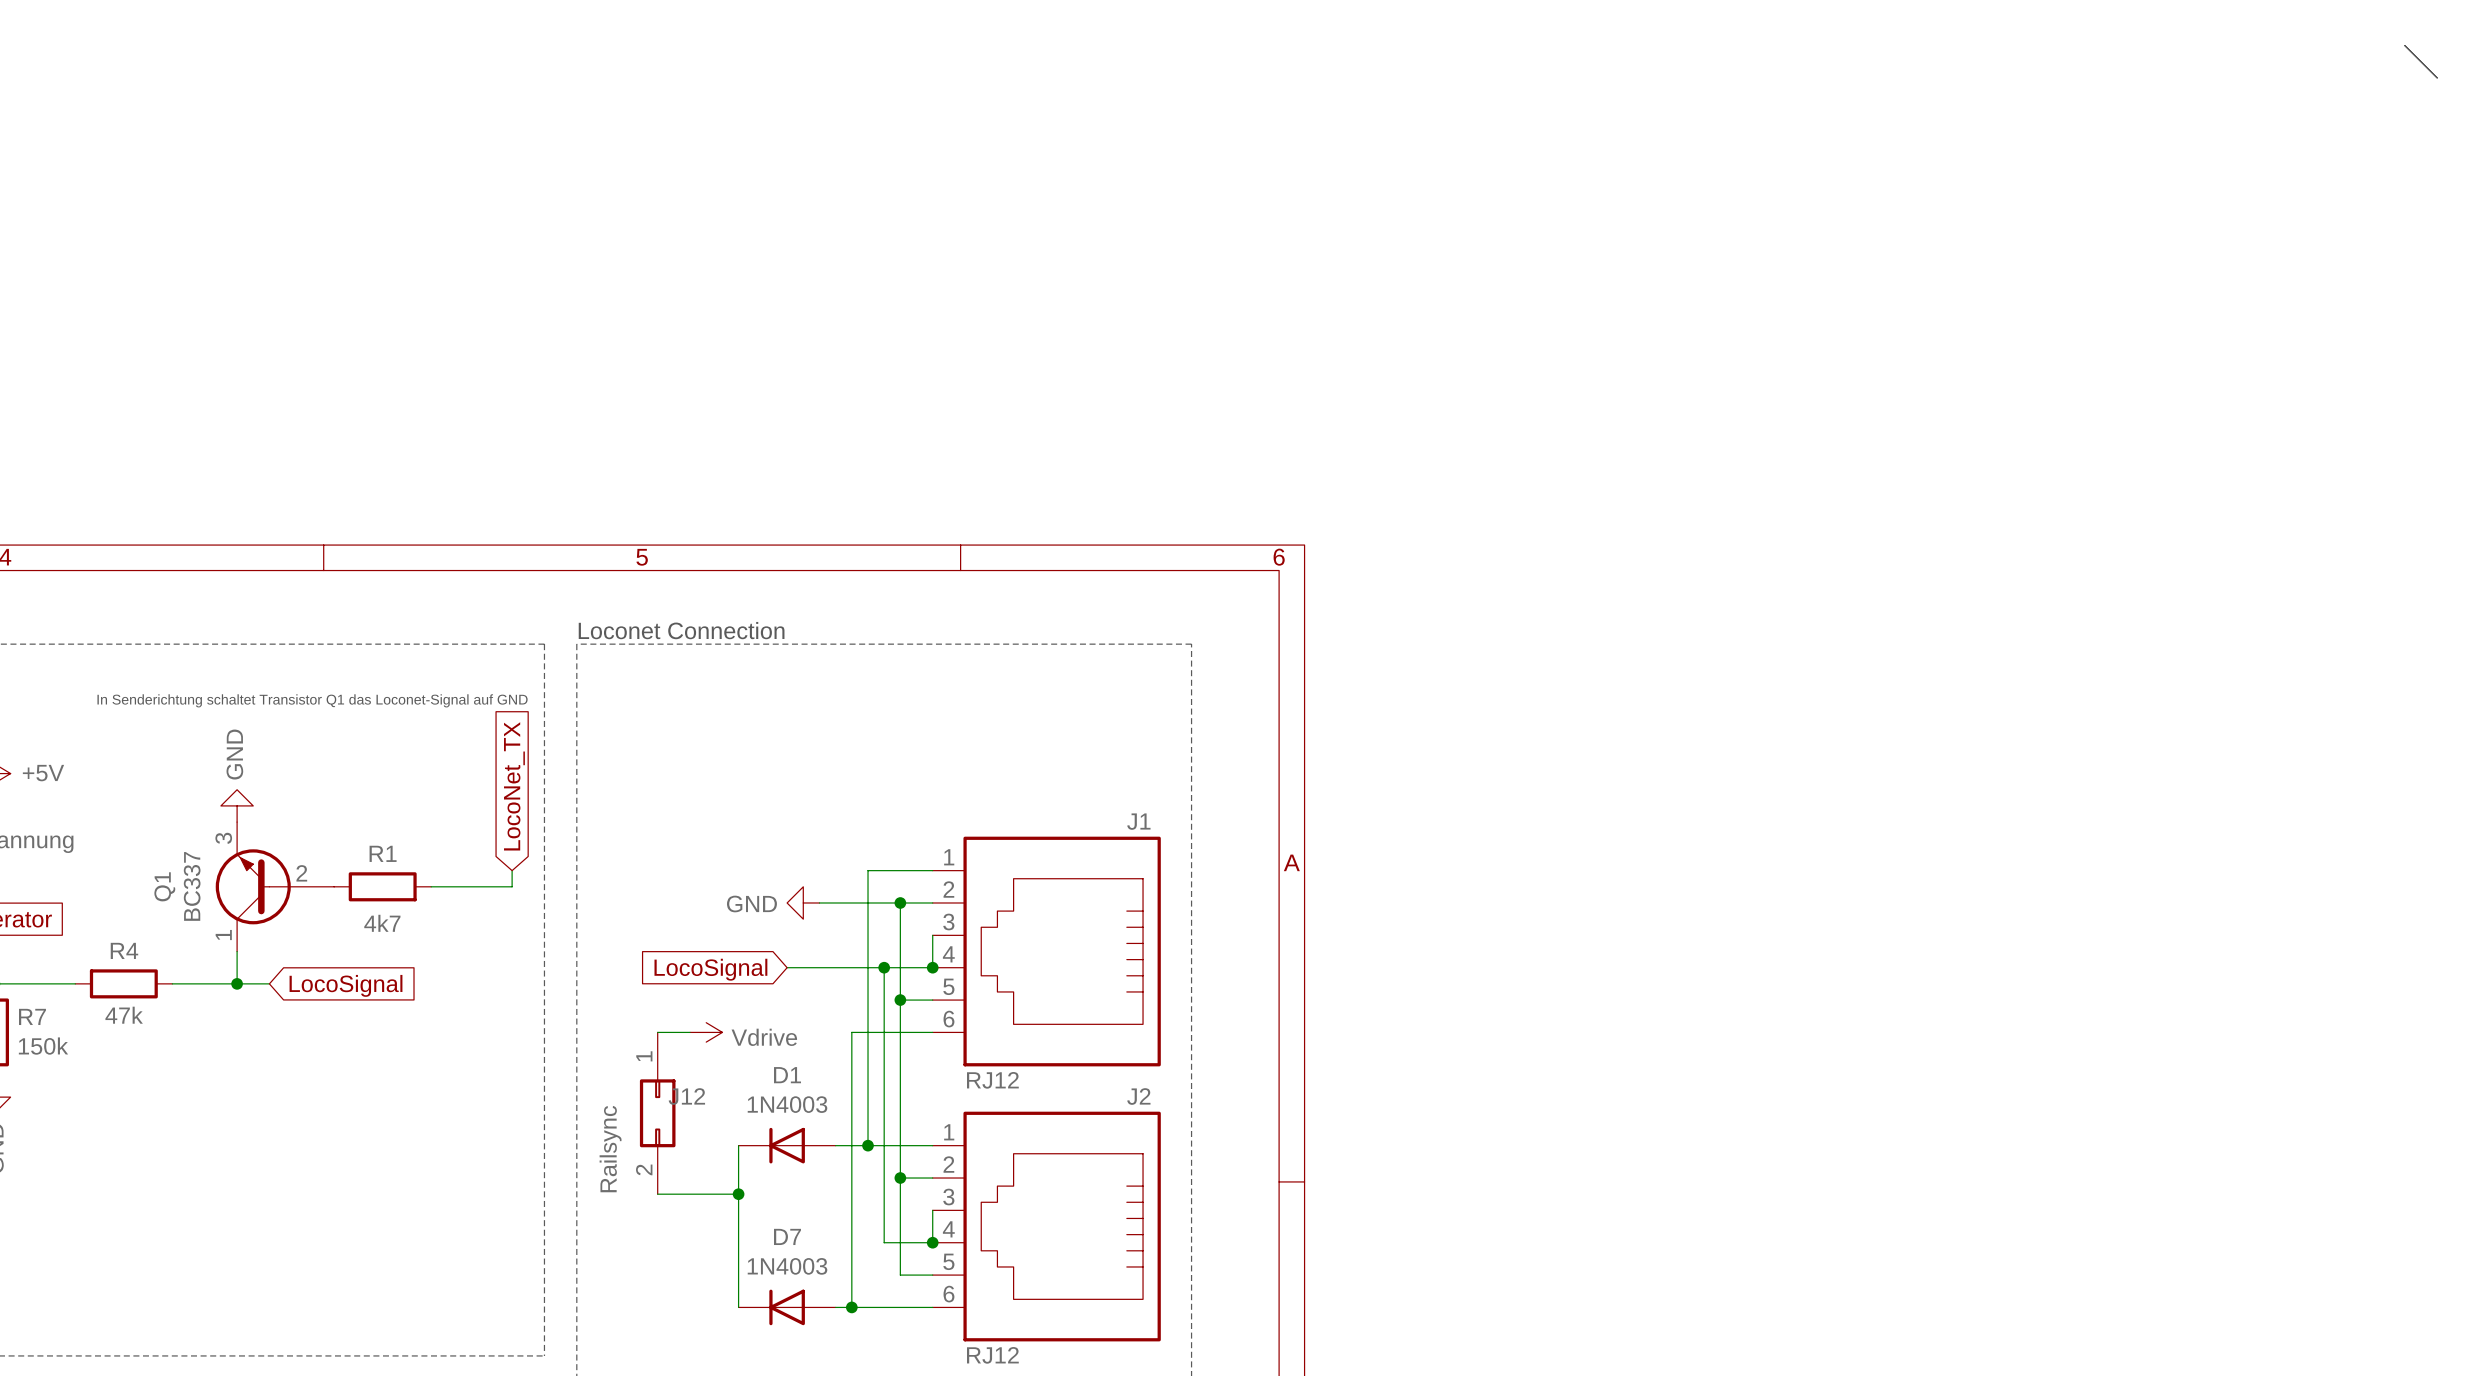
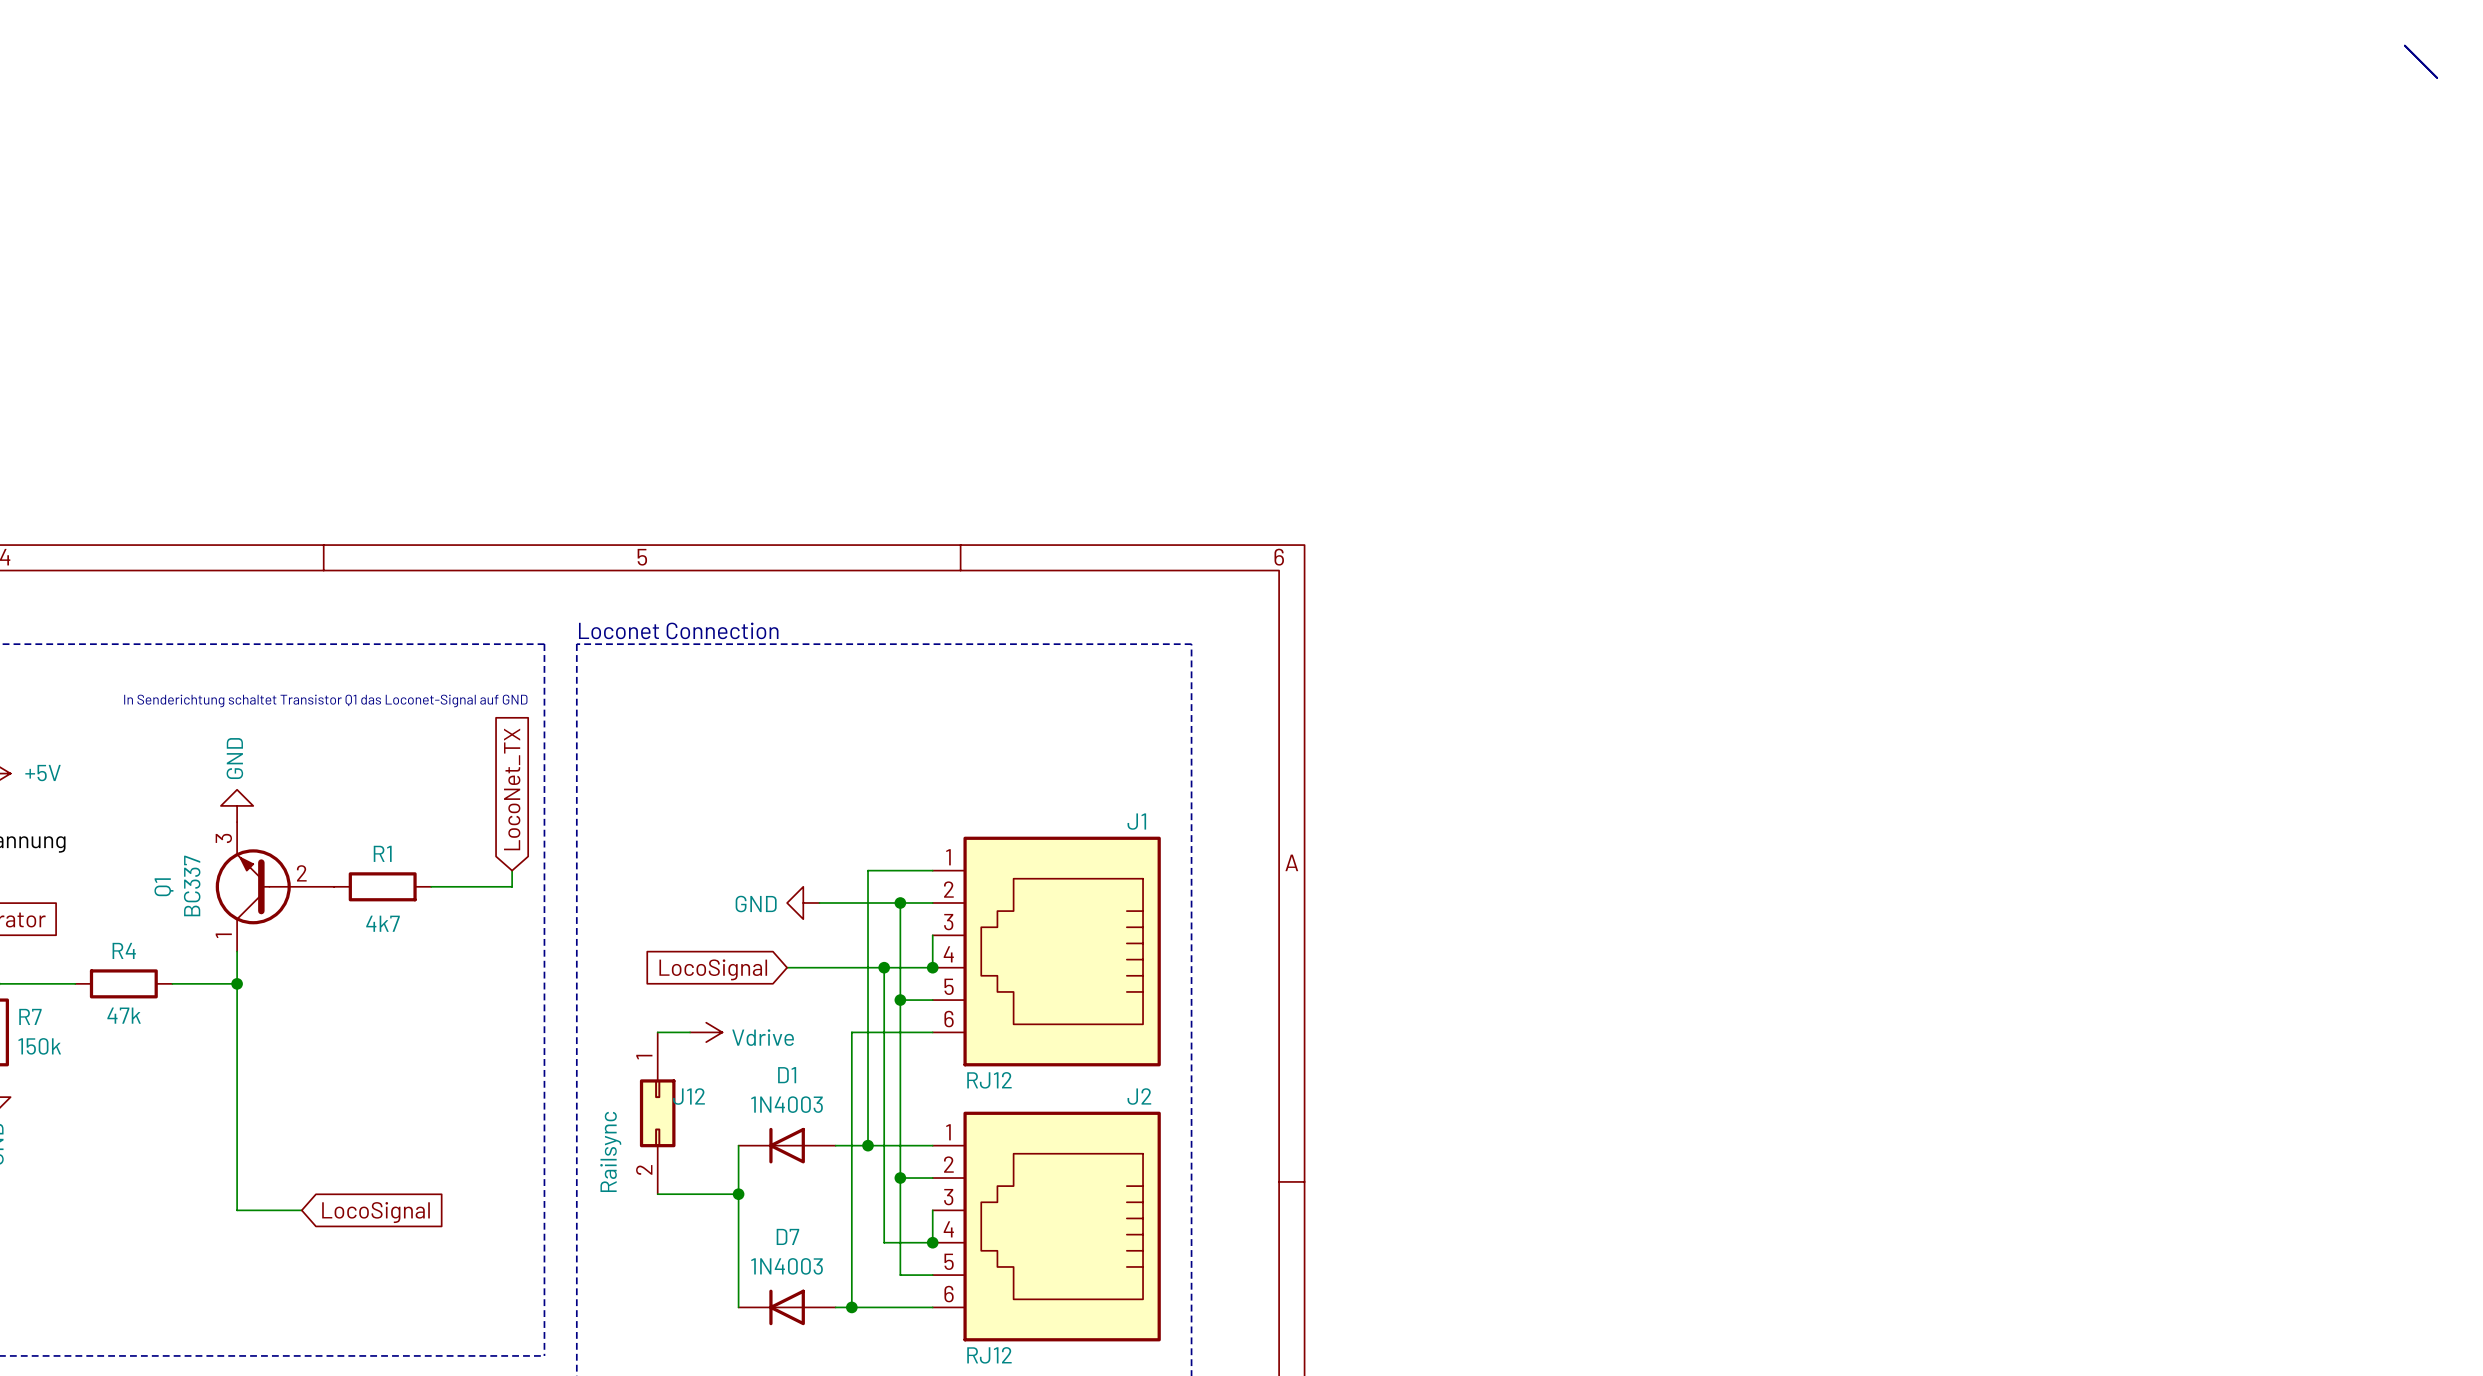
wire: (237, 983) (269, 983) -> (237, 983) (237, 1210) (301, 1210)
global label position: LocoSignal (346, 985) -> LocoSignal (376, 1212)

